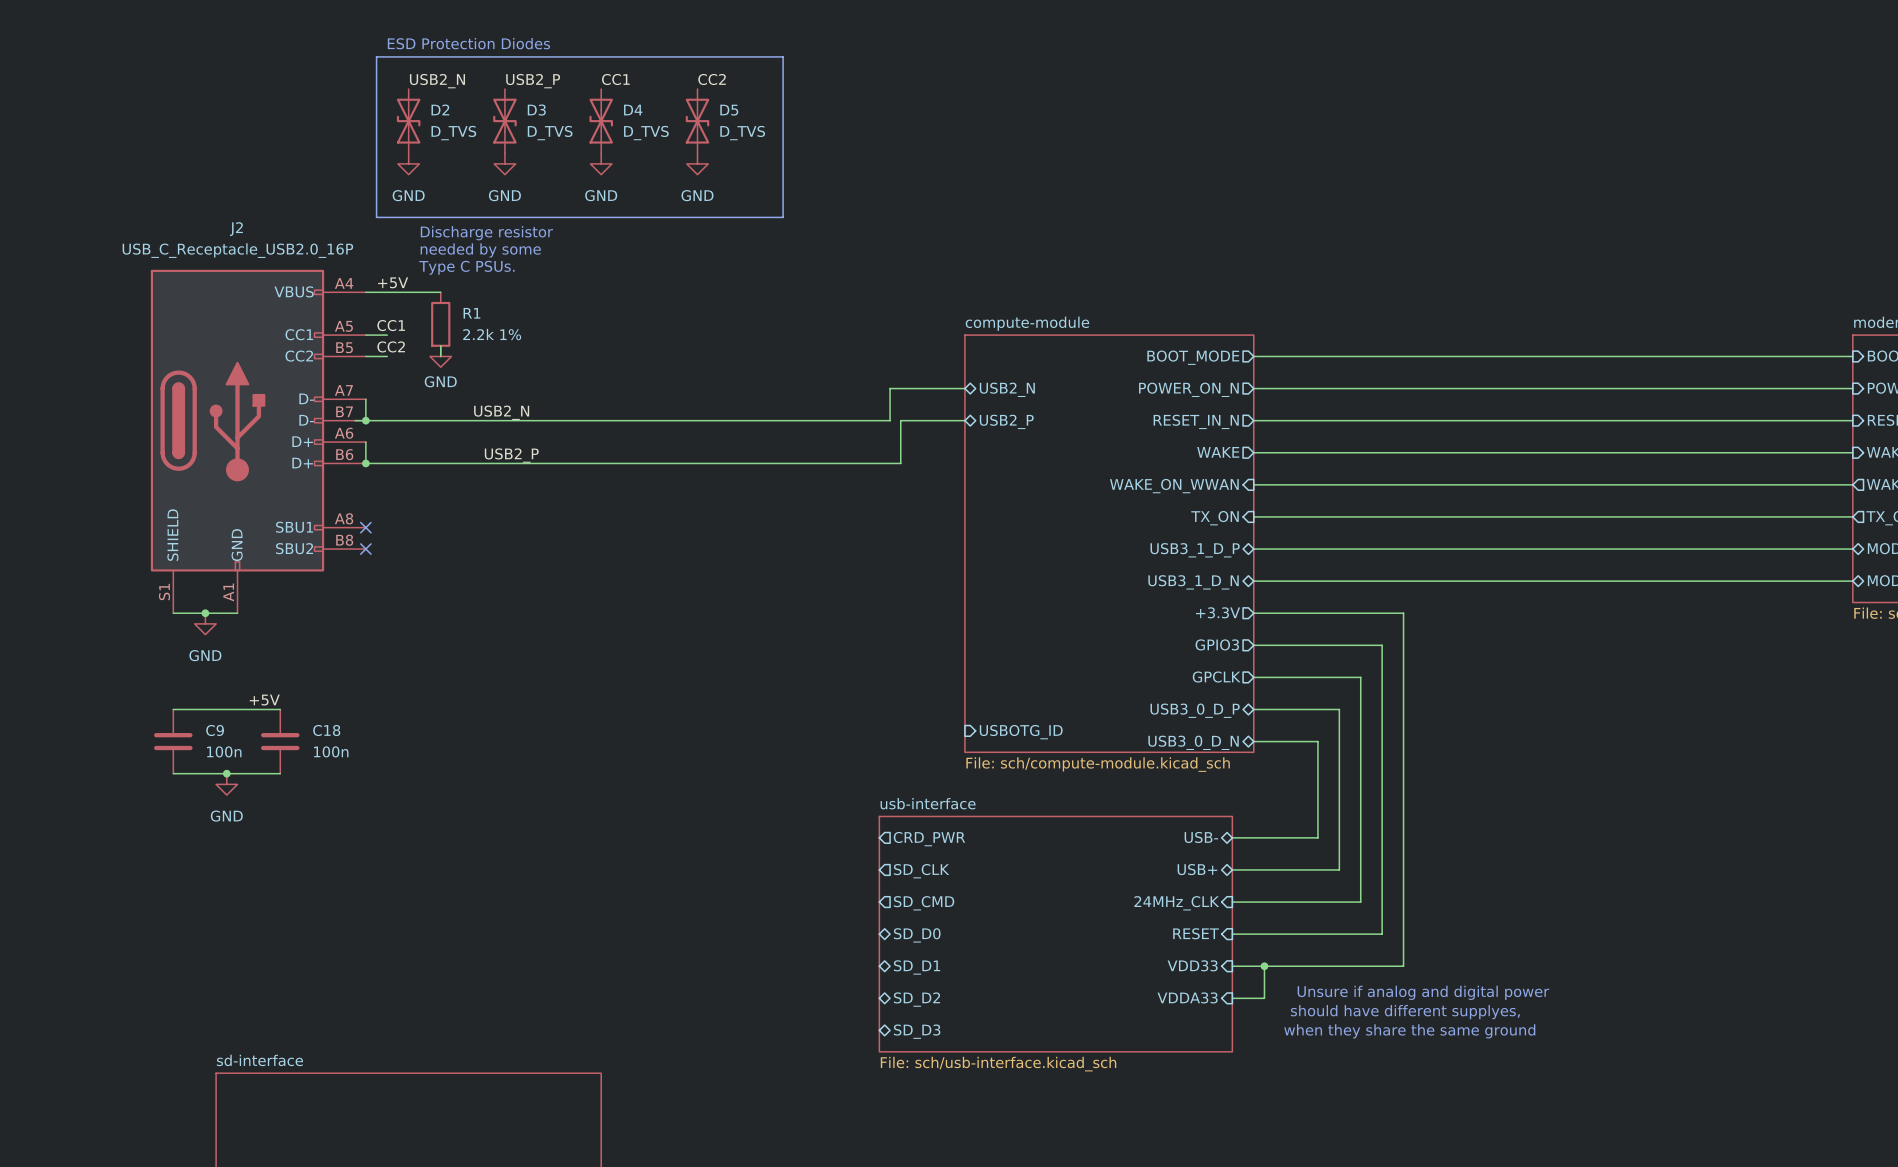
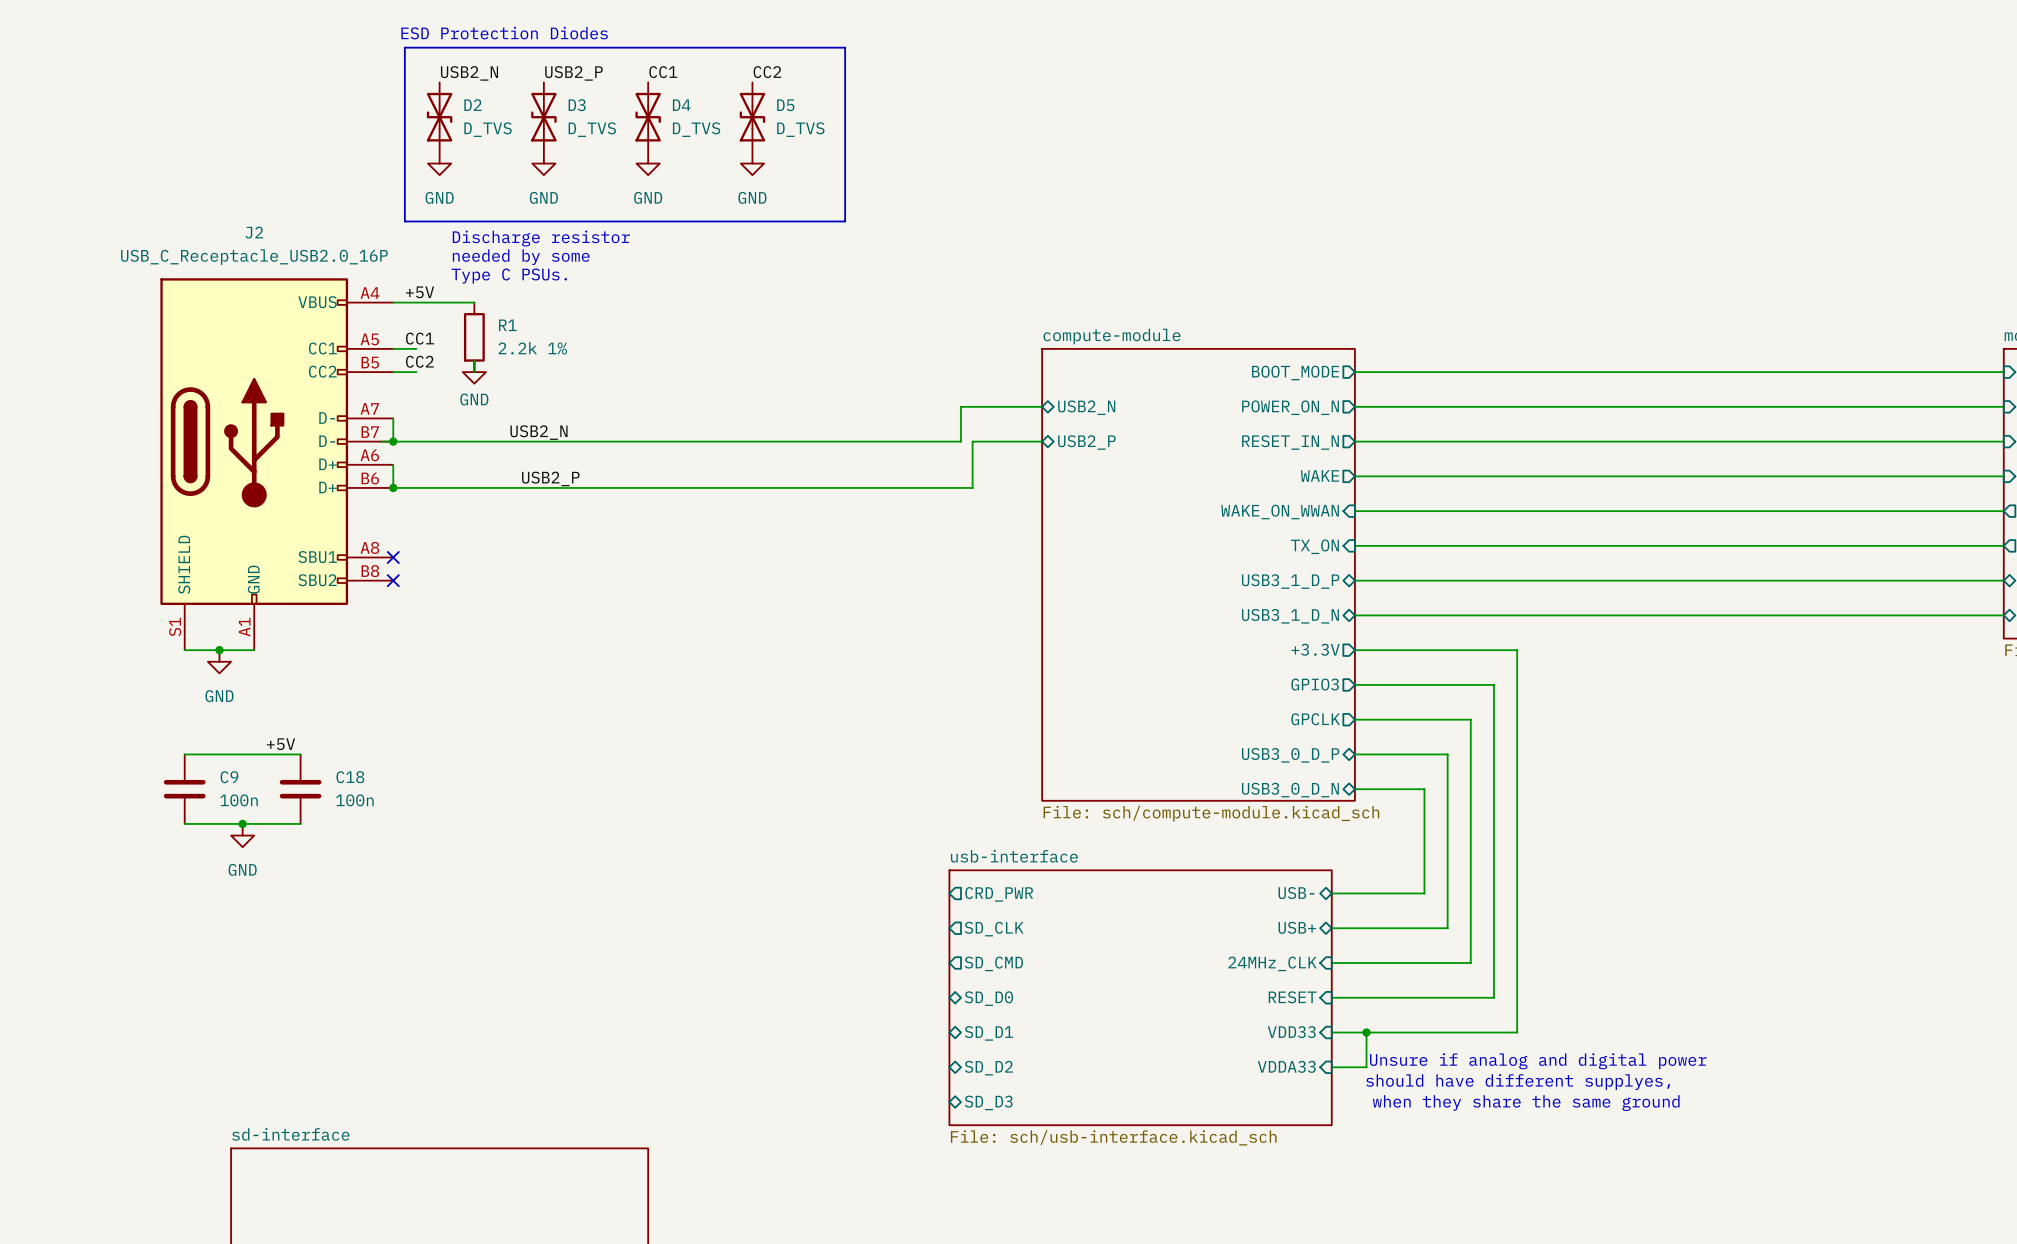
sheet pin: USBOTG_ID (1021, 732) -> none

